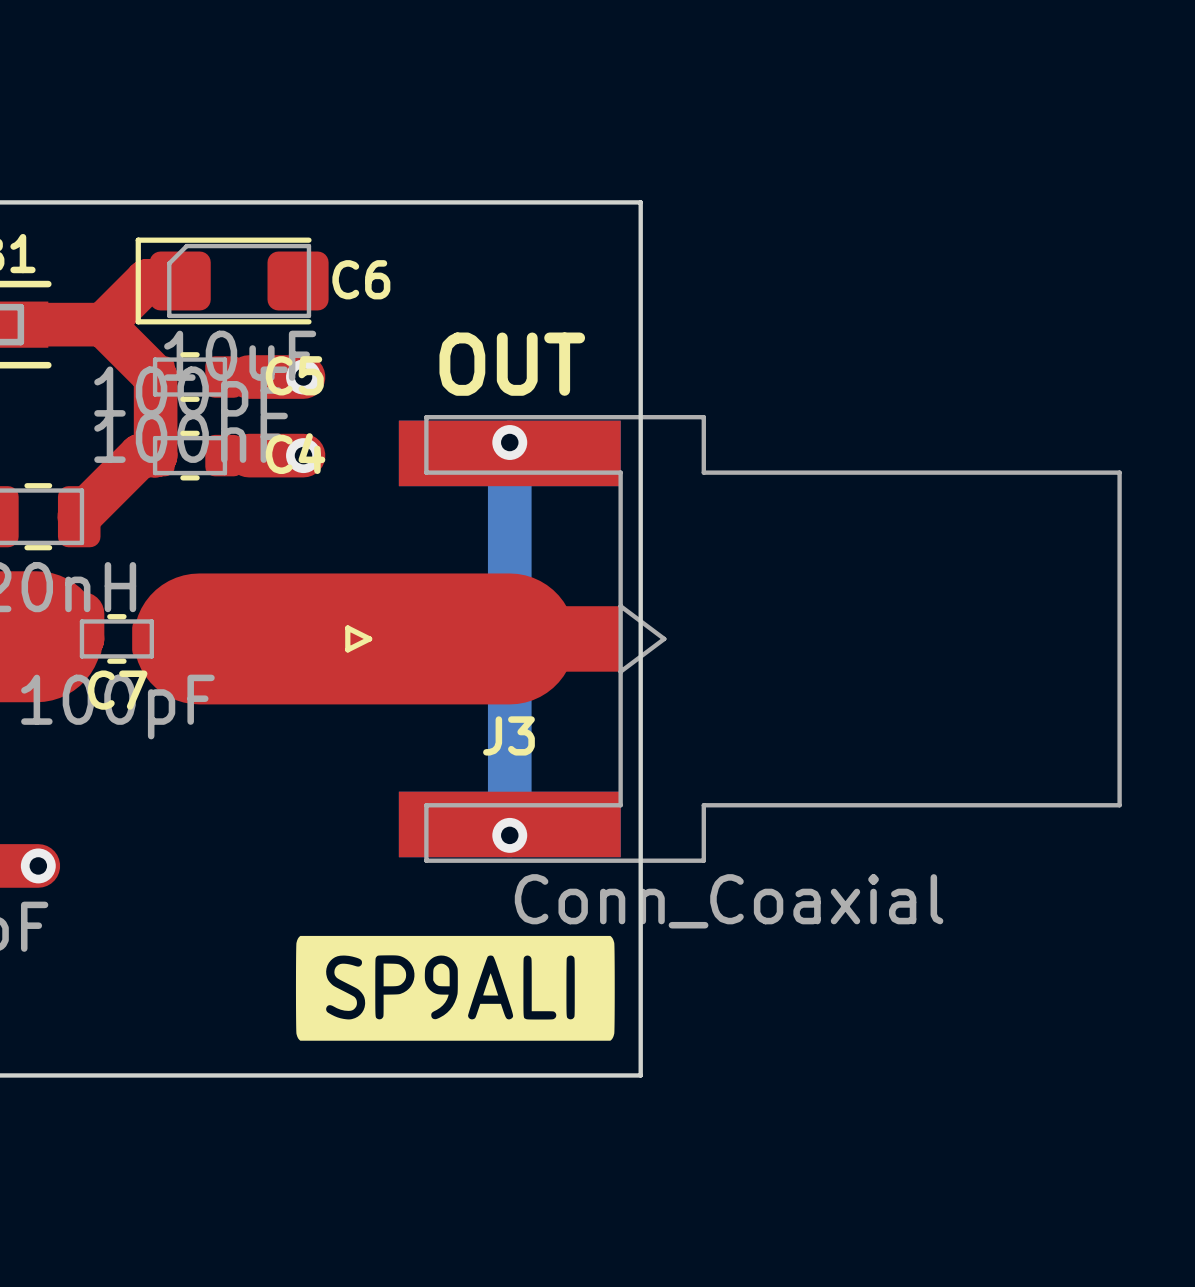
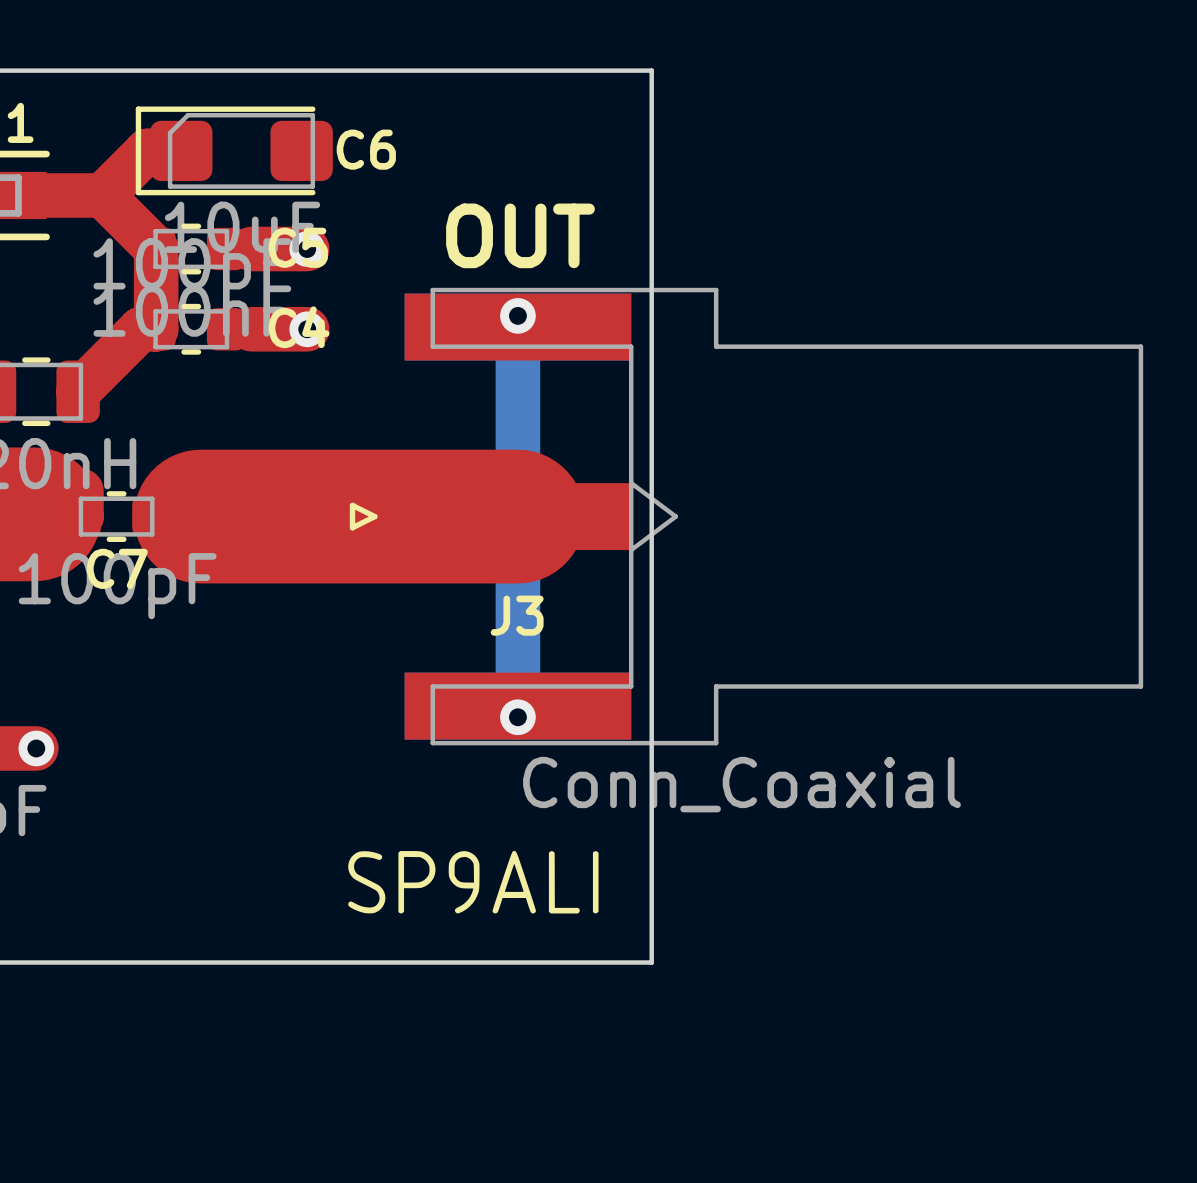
drawing shape: [295, 935, 615, 1041] -> [348, 851, 599, 914]

